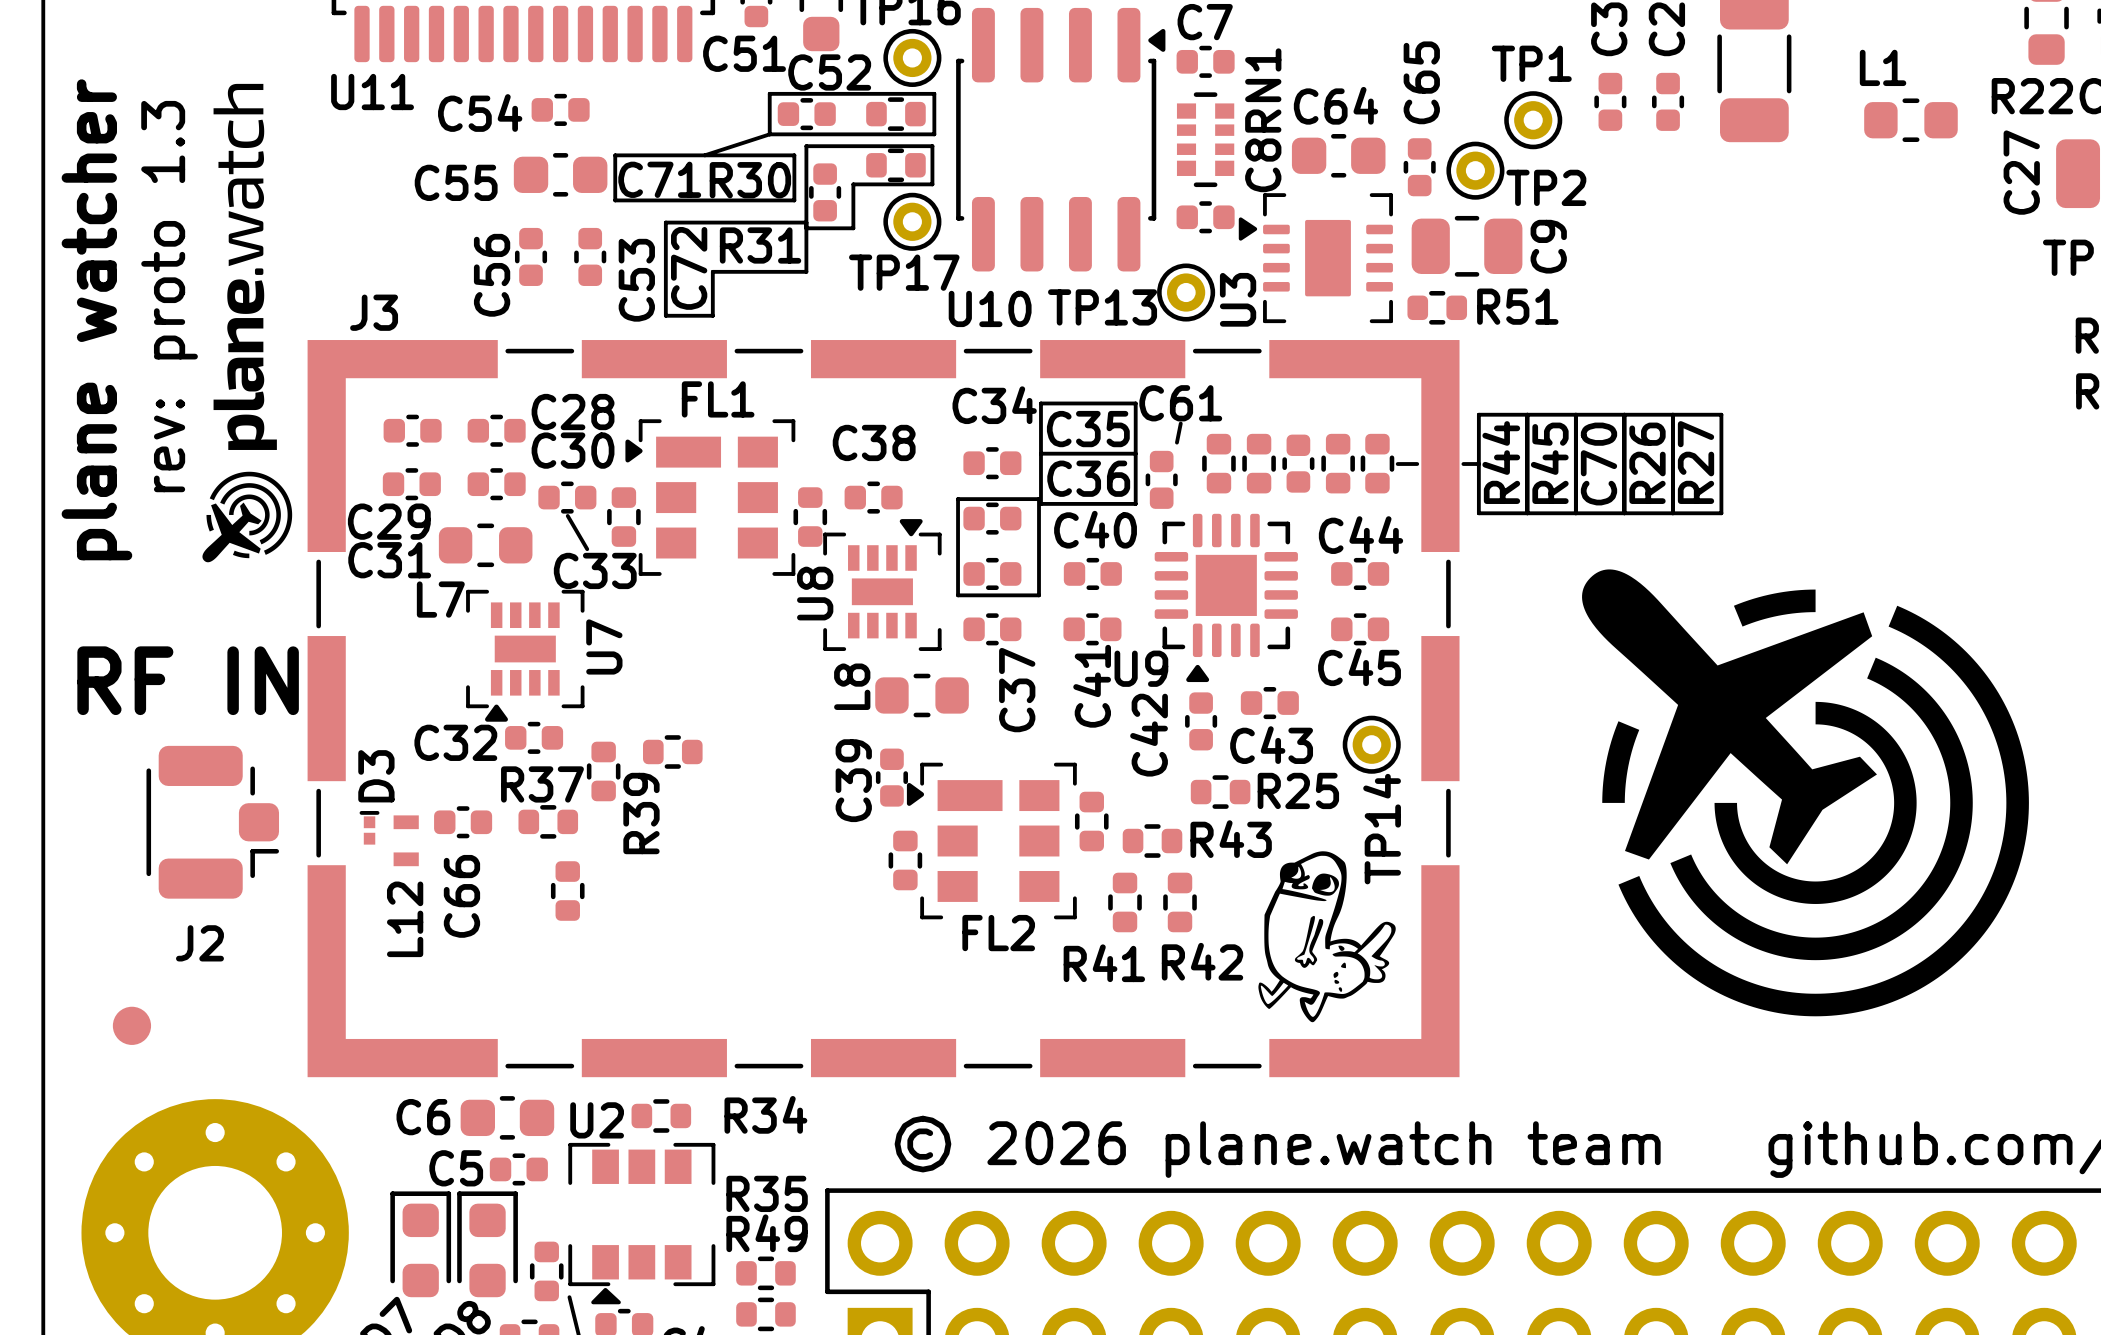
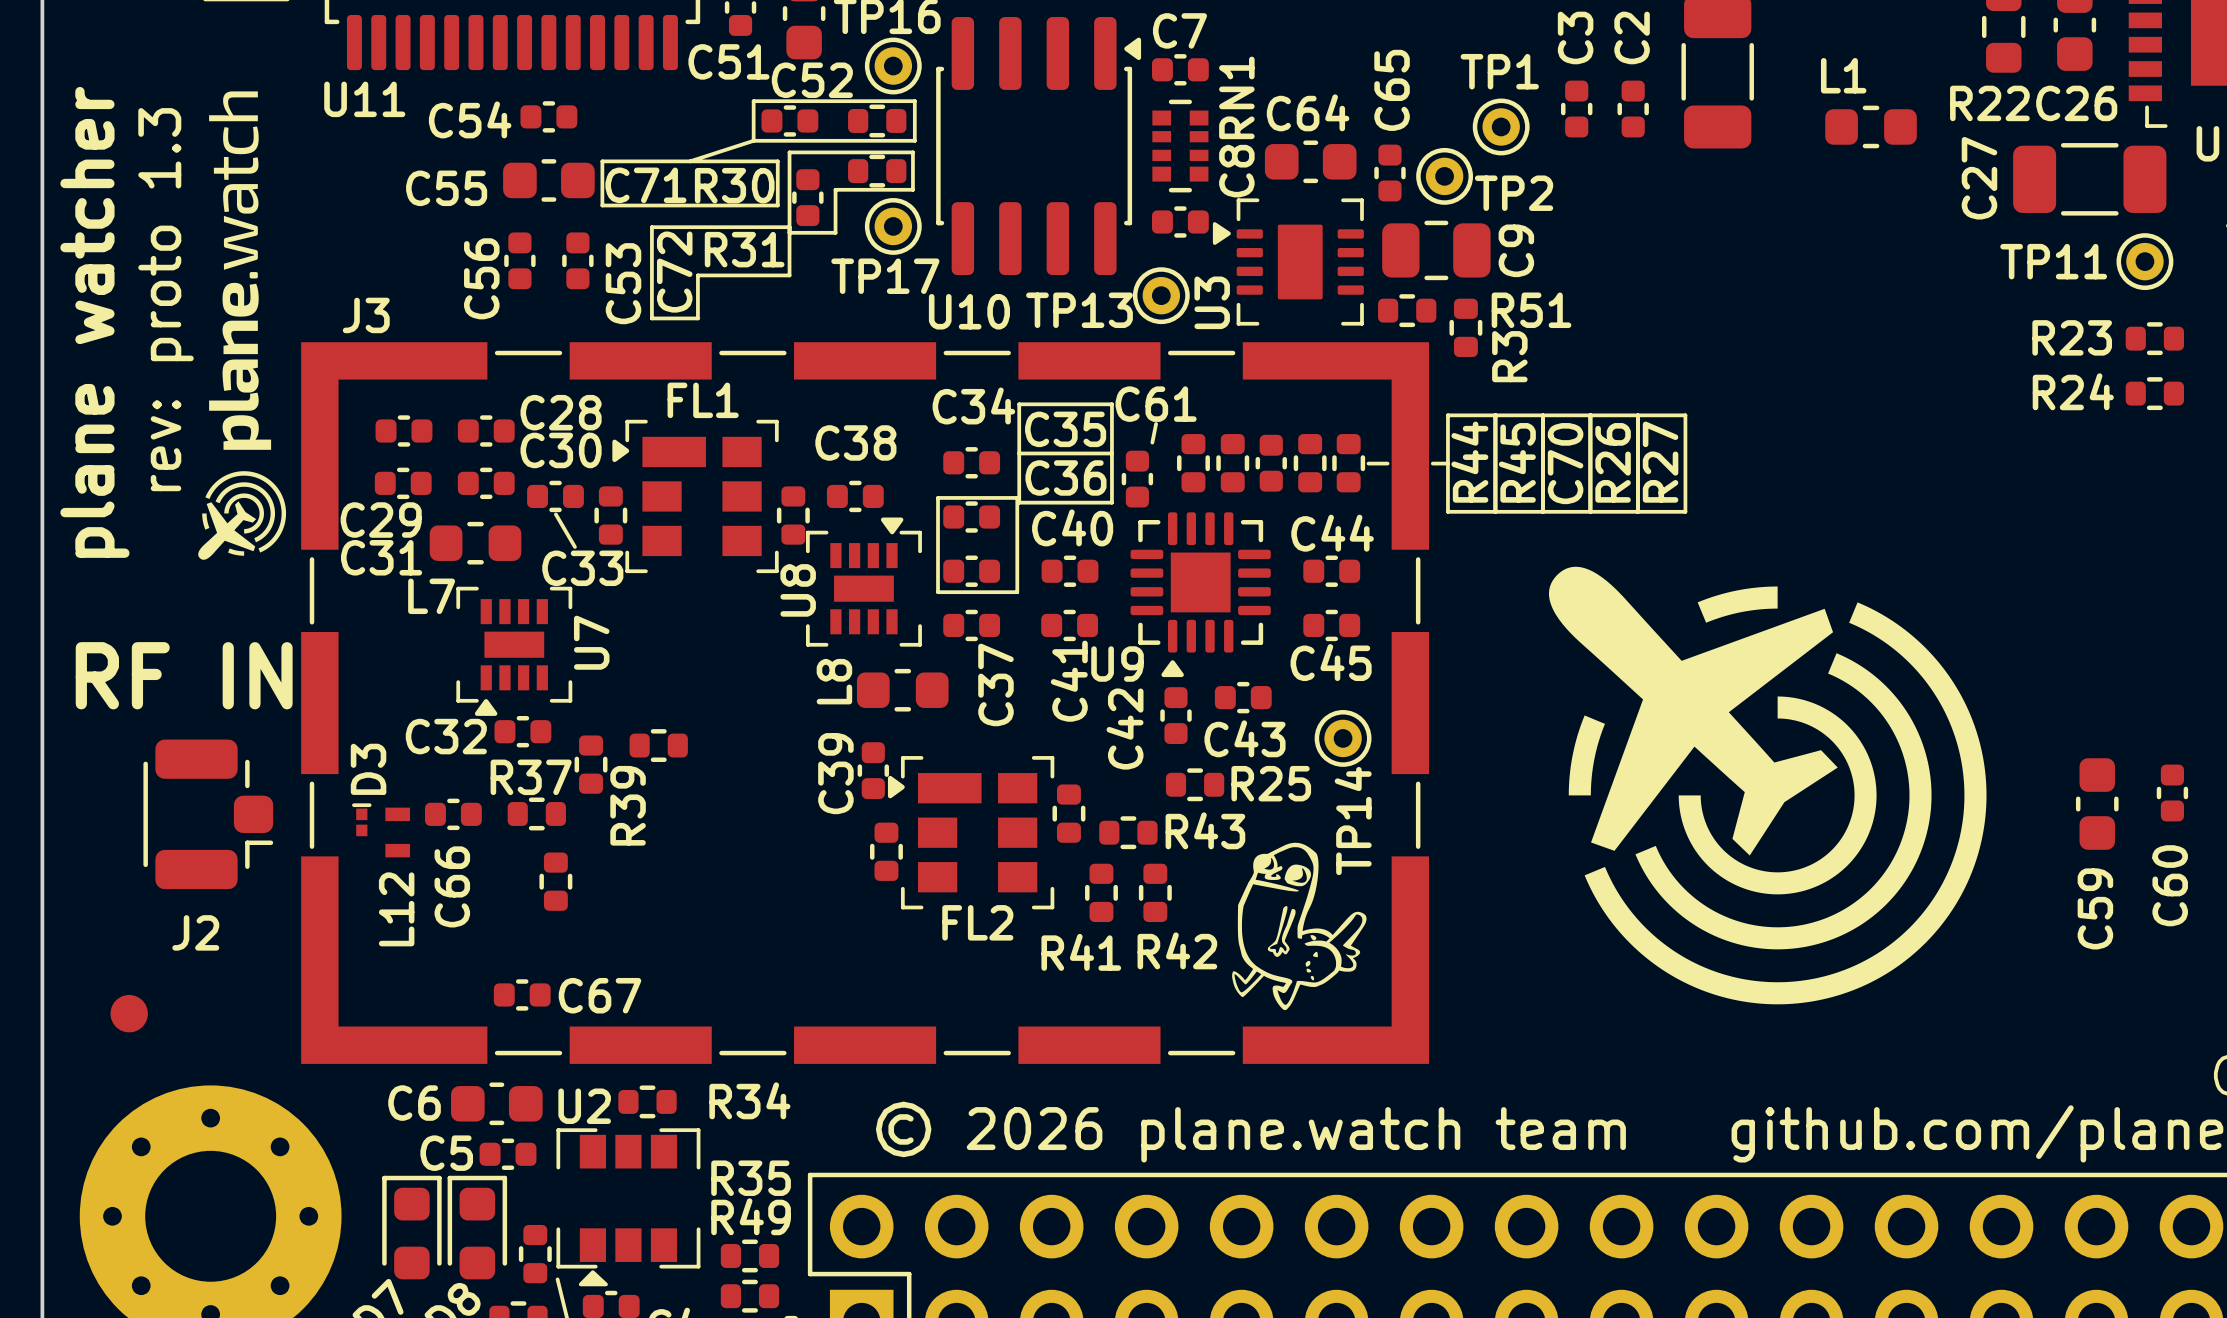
R51 name position: R51 (1517, 306) -> R51 (1531, 310)
R3: none -> (1465, 327)
C67: none -> (522, 994)

